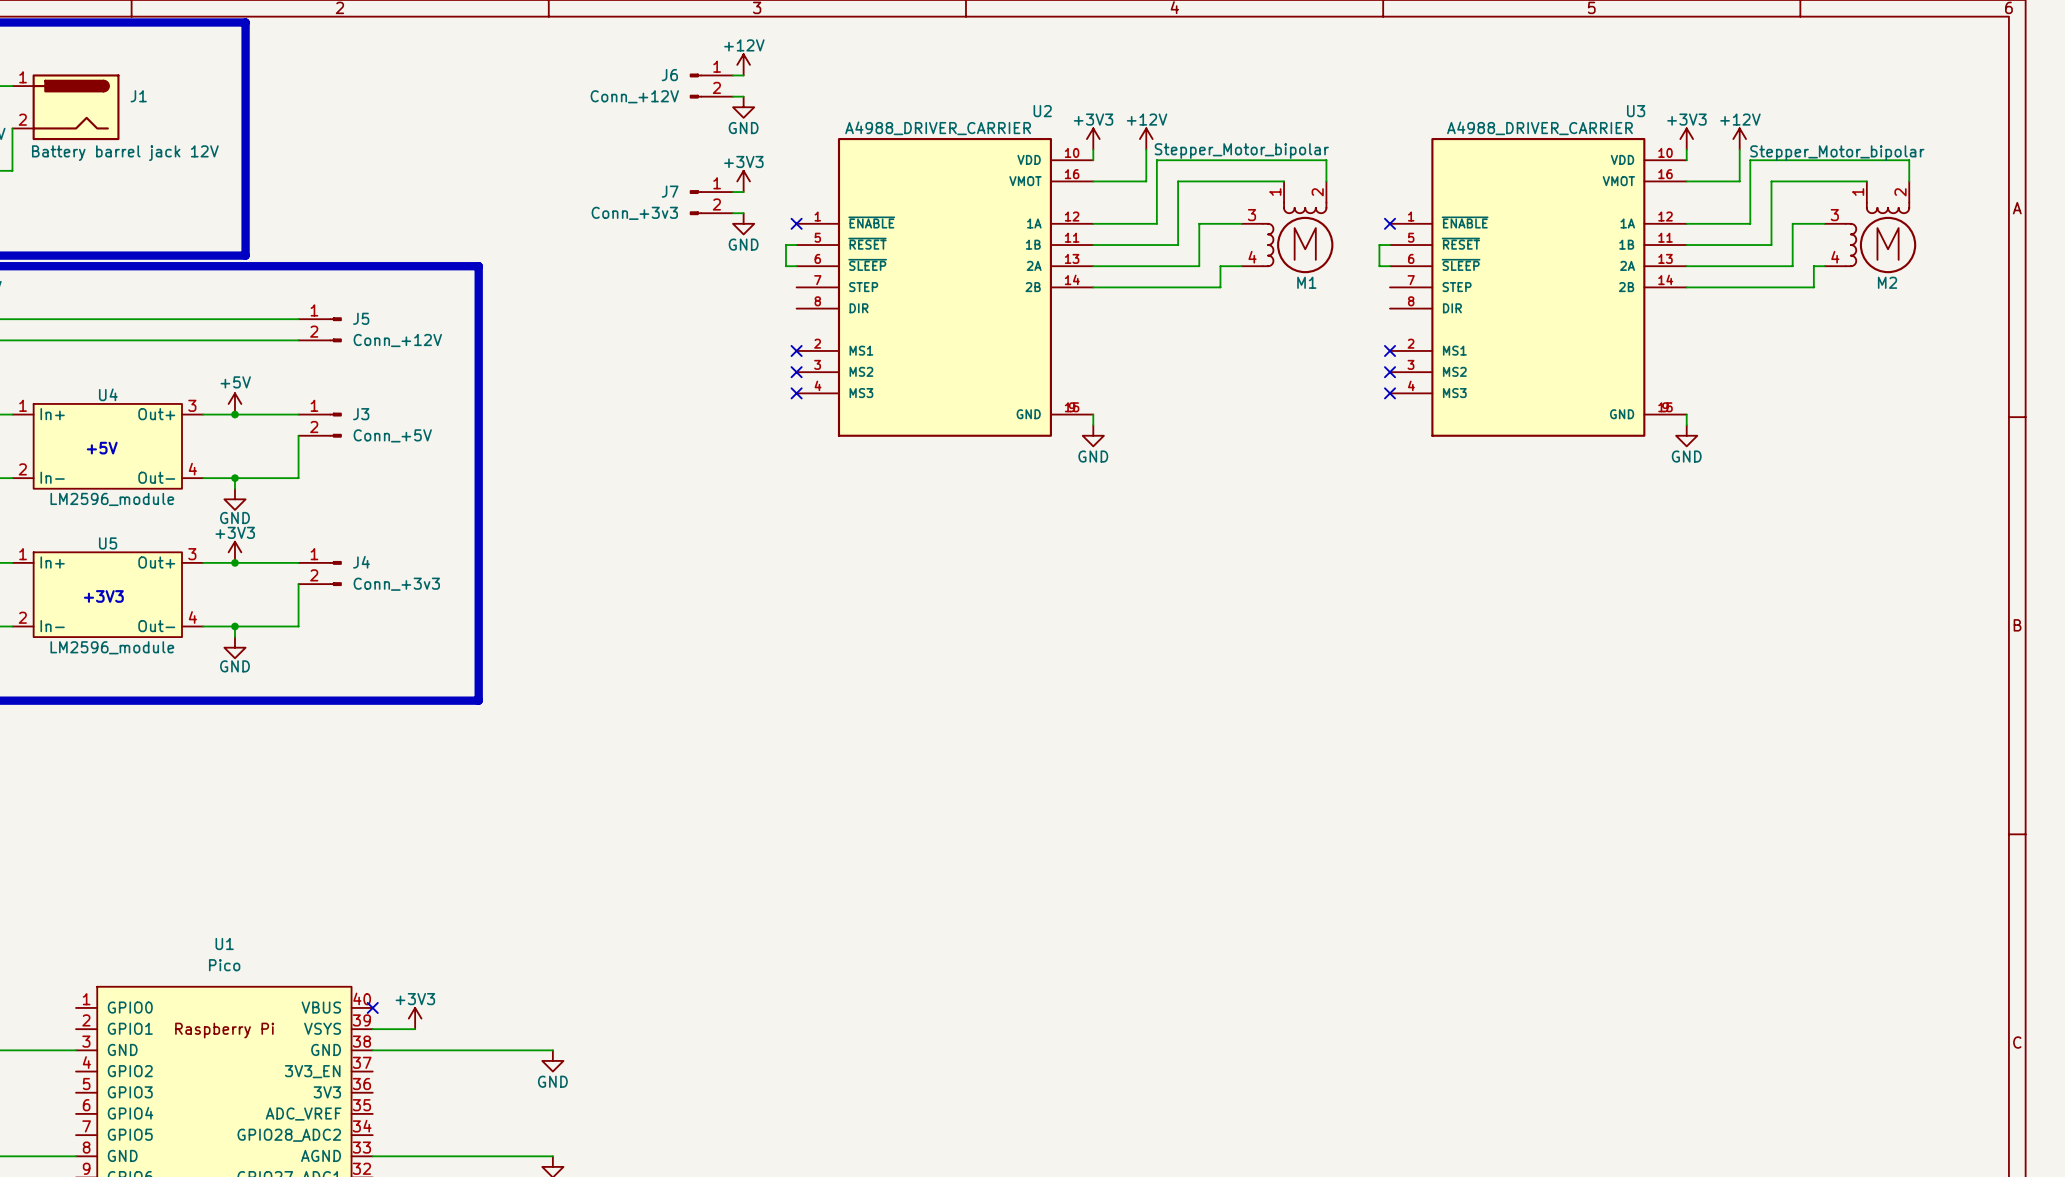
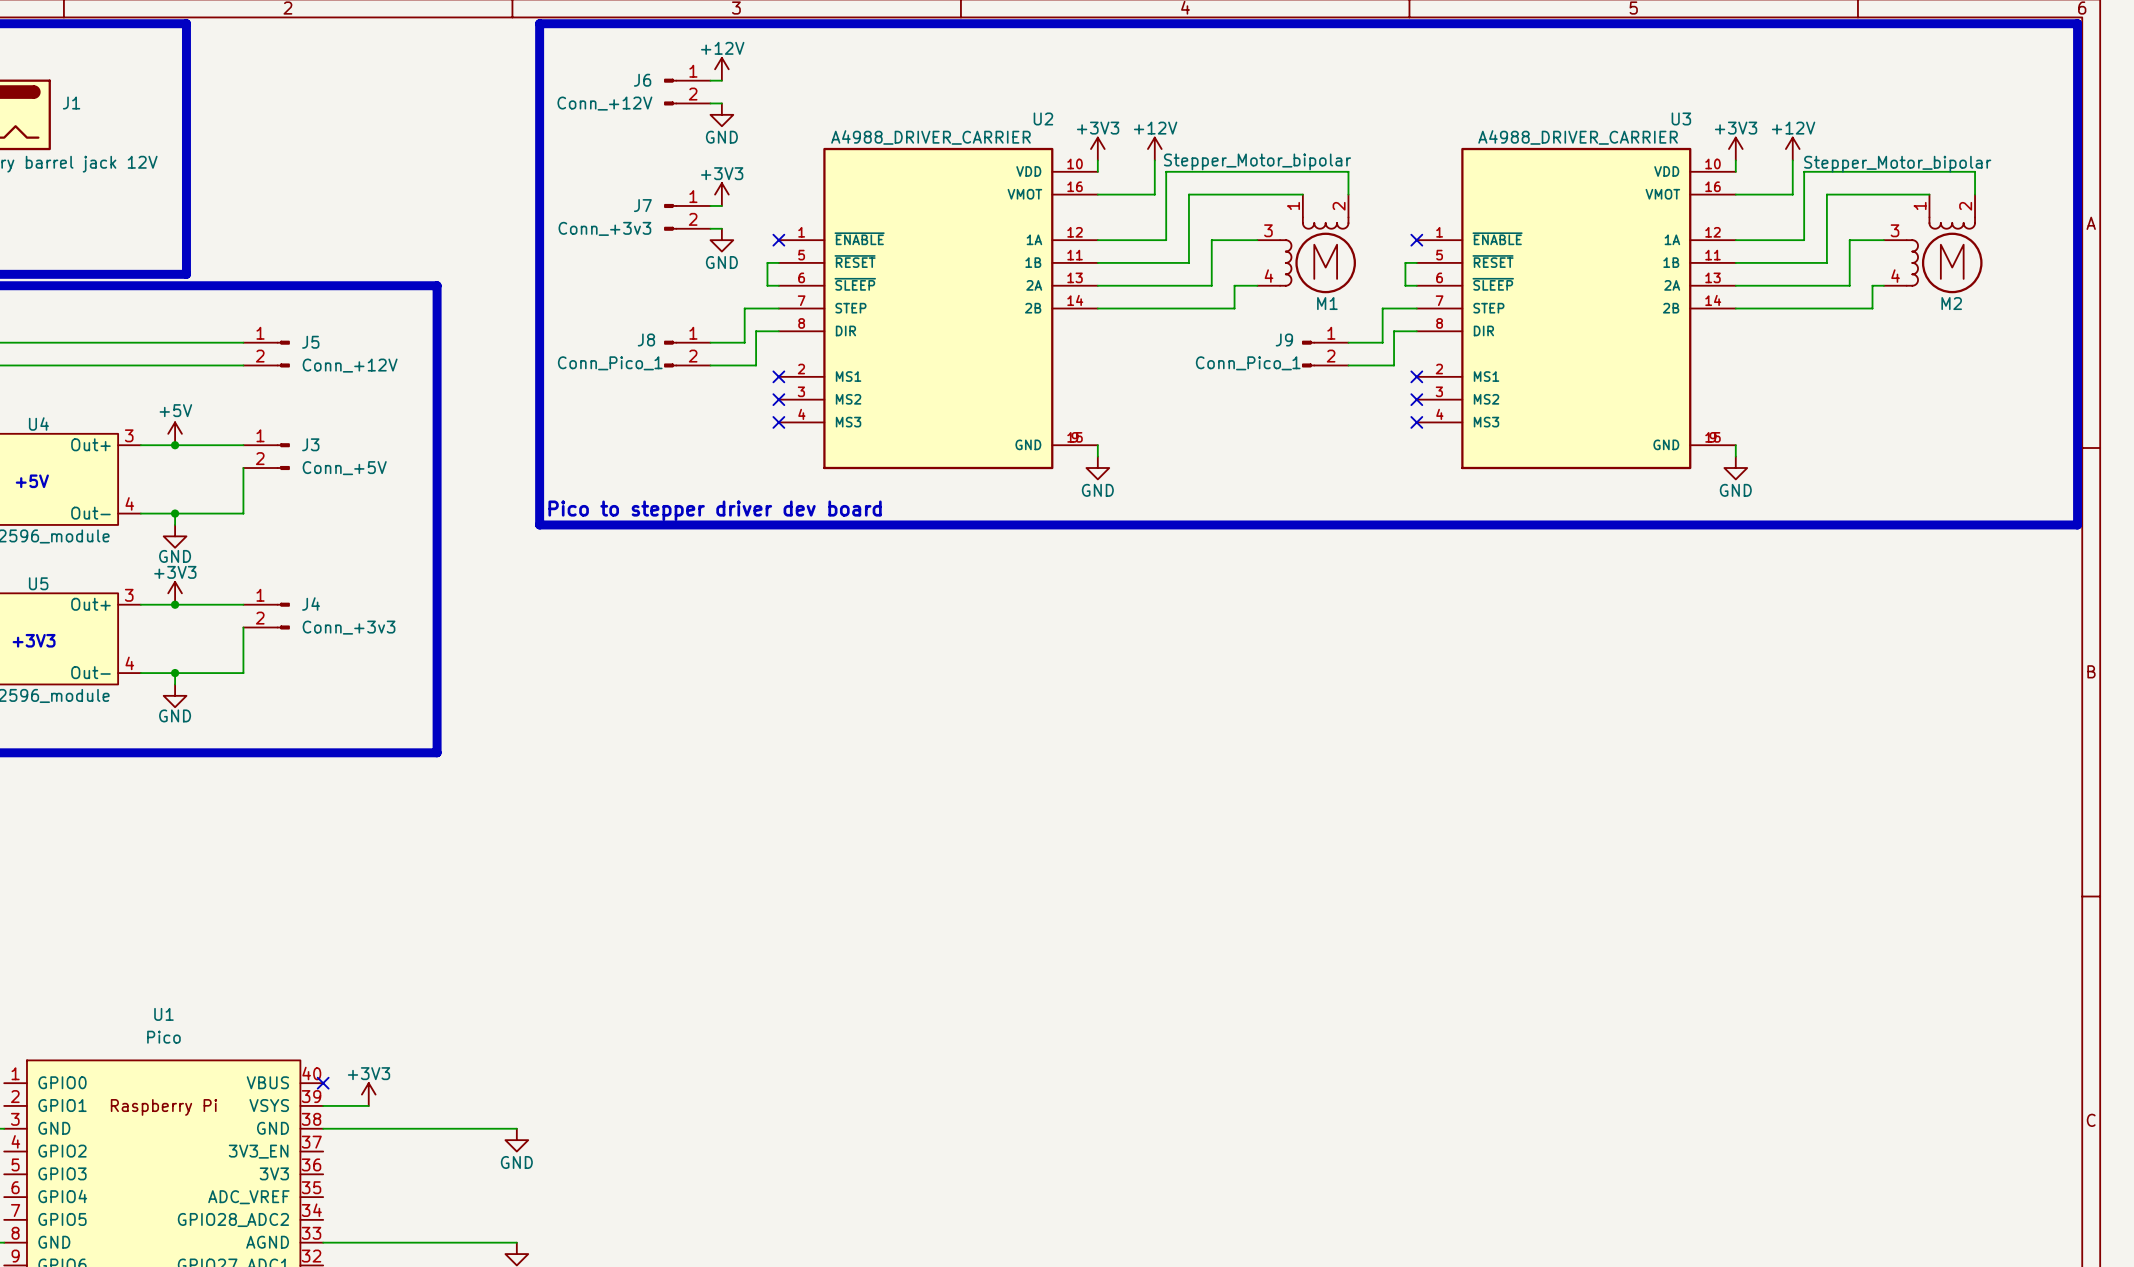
line: none -> (539, 23) (2077, 23) (2077, 524) (539, 524) (539, 23)
wire: none -> (778, 308) (744, 308) (744, 342) (710, 342)
wire: none -> (1416, 308) (1382, 308) (1382, 342) (1348, 342)
wire: none -> (778, 331) (756, 331) (756, 365) (710, 365)
wire: none -> (1416, 331) (1394, 331) (1394, 365) (1348, 365)
J8: none -> Conn_Pico_1 (687, 354)
J9: none -> Conn_Pico_1 (1325, 354)
text: none -> Pico to stepper driver dev board (715, 510)

